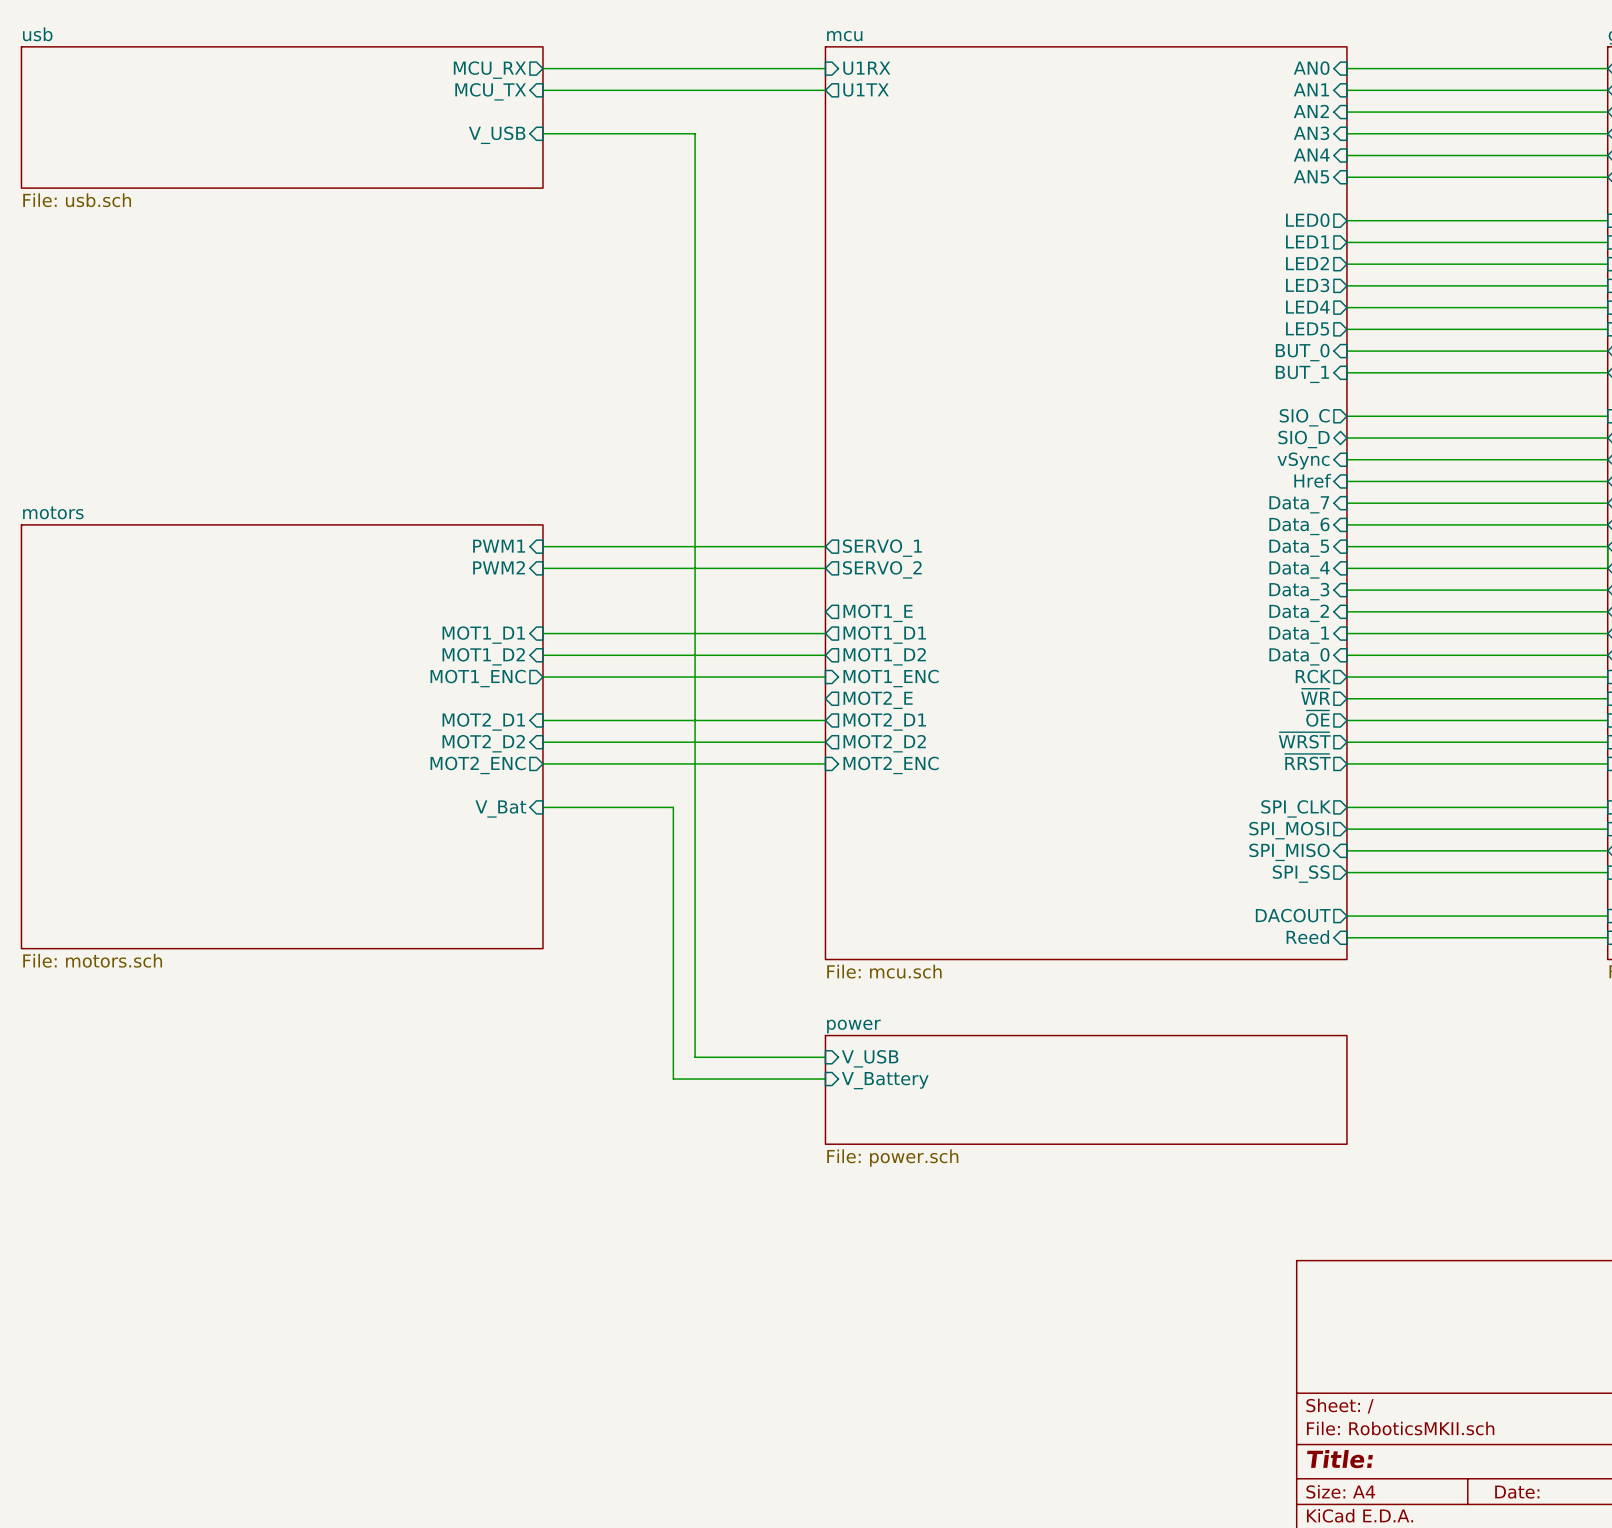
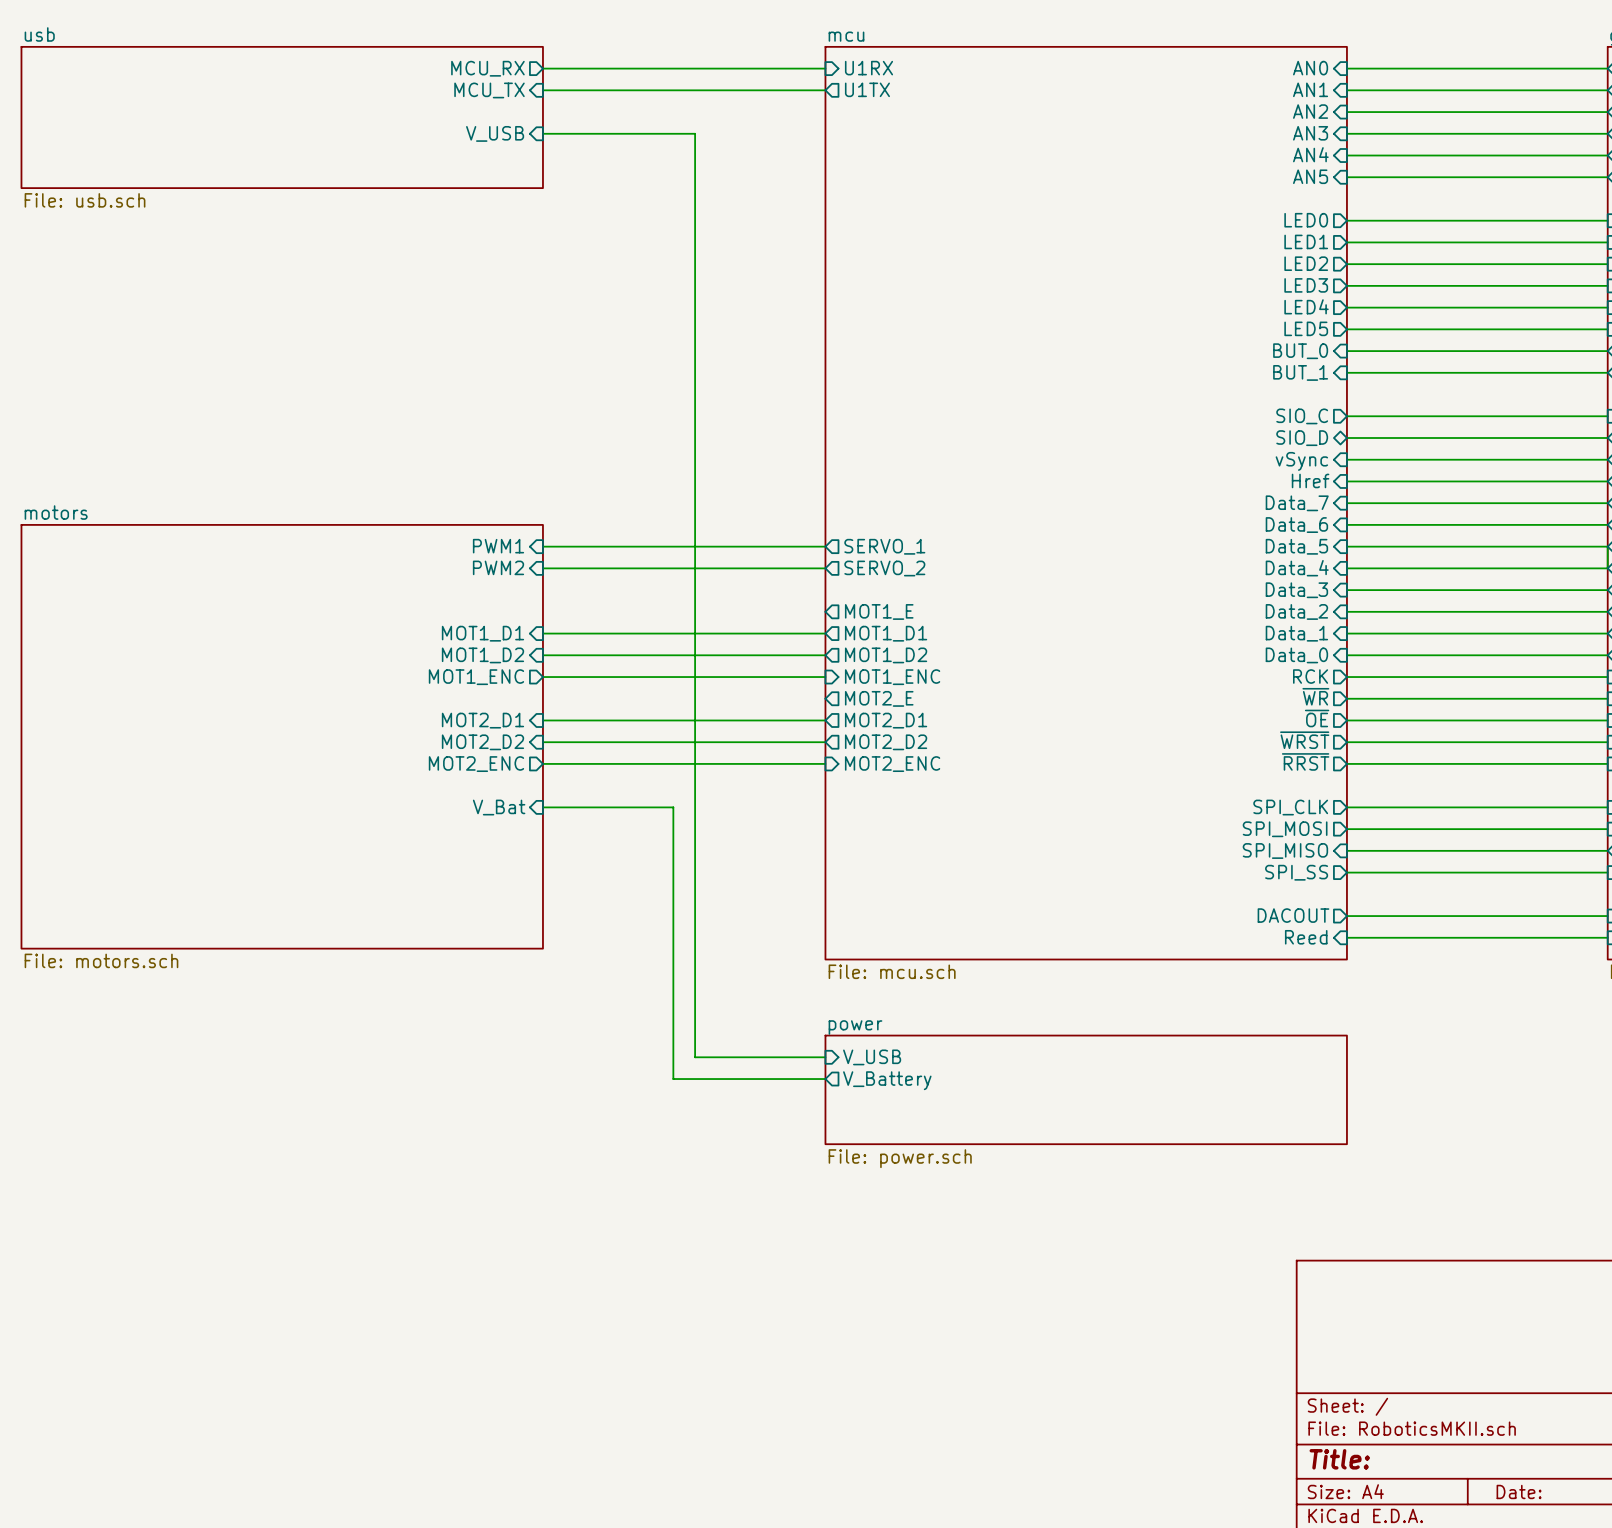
sheet pin shape: input (885, 1080) -> output (887, 1080)

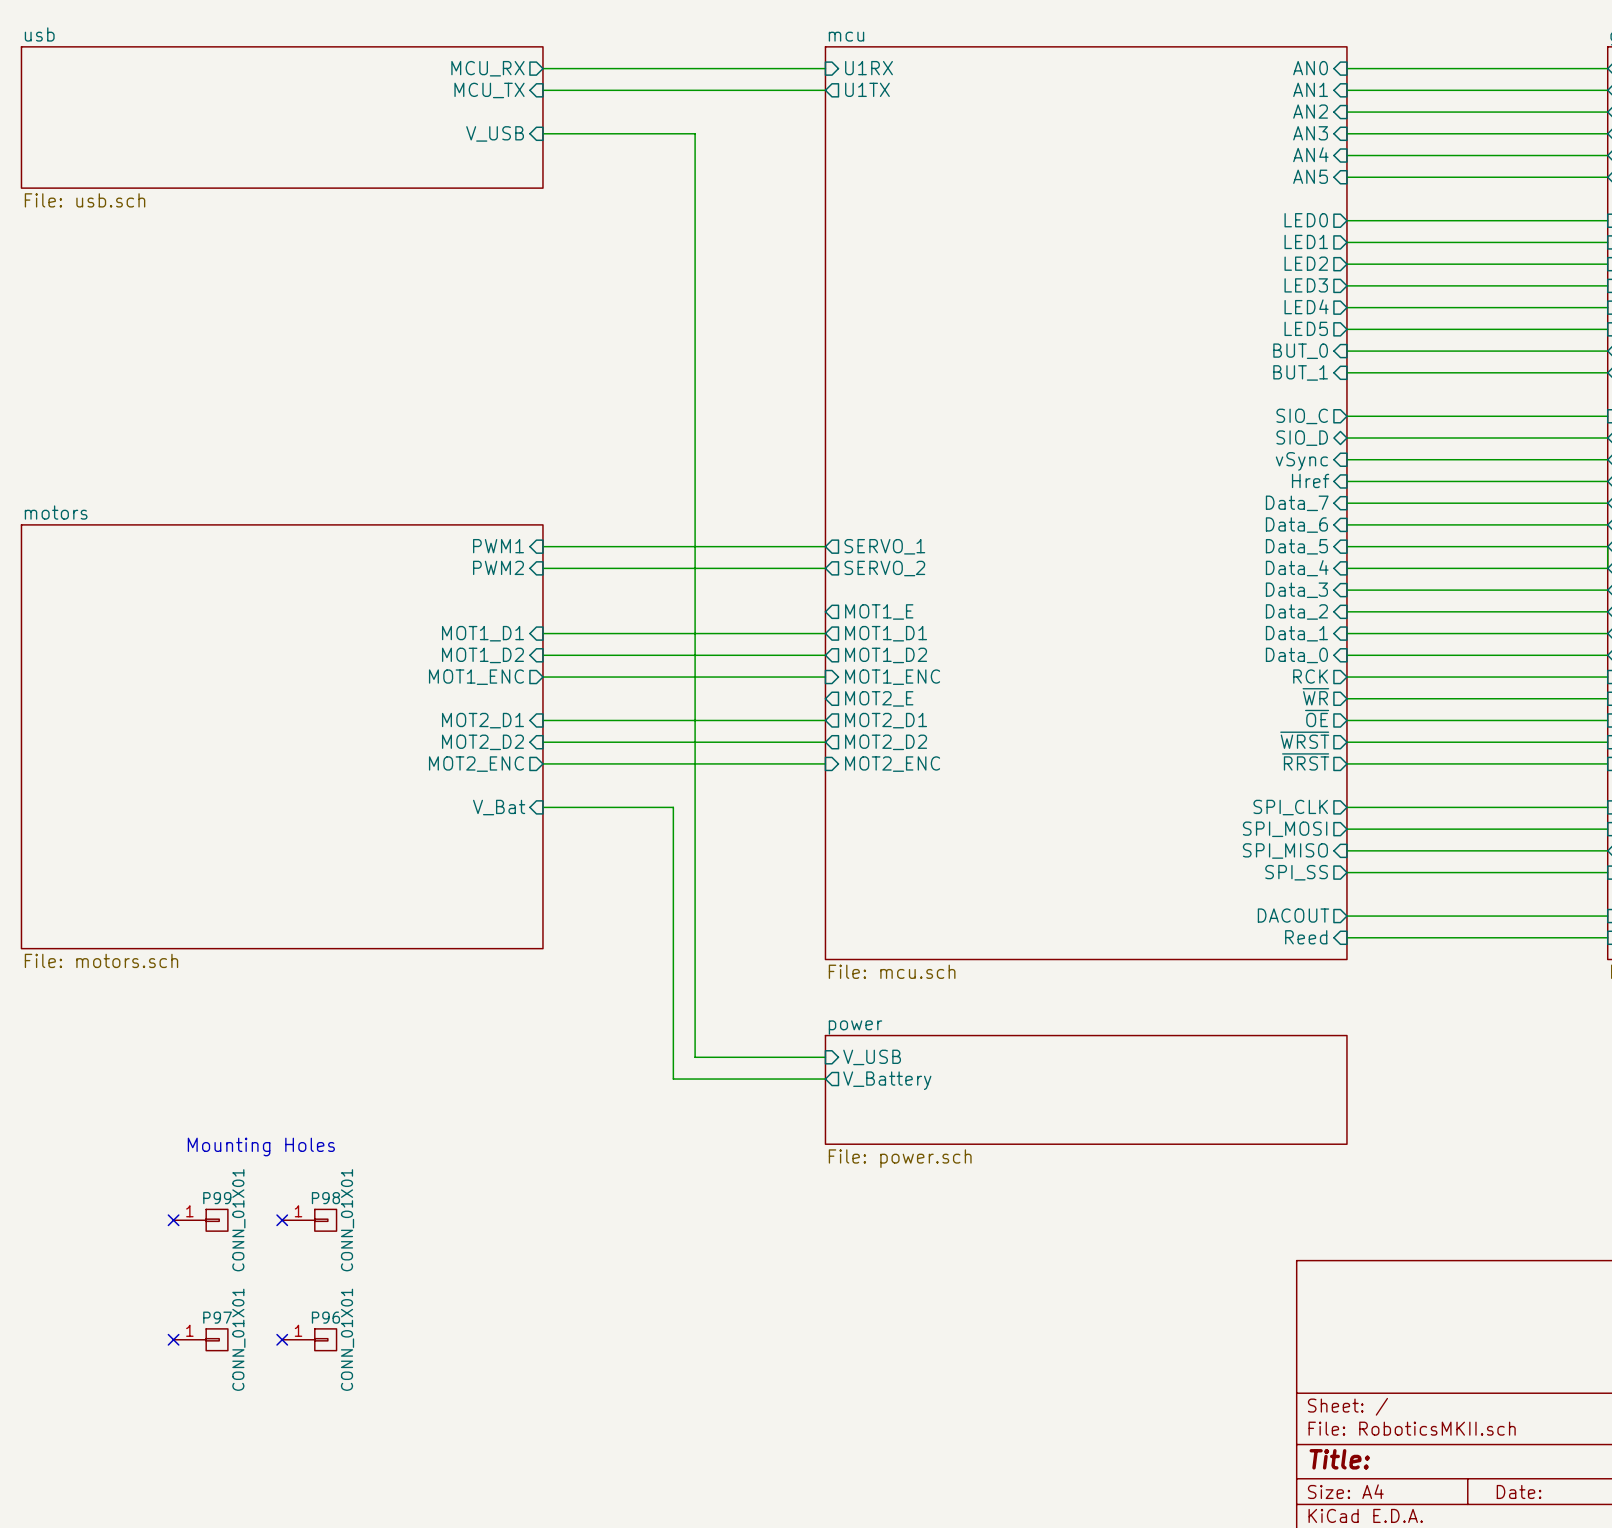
text: none -> Mounting Holes (261, 1146)
no-connect mark: none -> (173, 1220)
P99: none -> CONN_01X01 (200, 1220)
no-connect mark: none -> (282, 1220)
P98: none -> CONN_01X01 (309, 1220)
no-connect mark: none -> (173, 1339)
P97: none -> CONN_01X01 (200, 1339)
no-connect mark: none -> (282, 1339)
P96: none -> CONN_01X01 (309, 1339)

